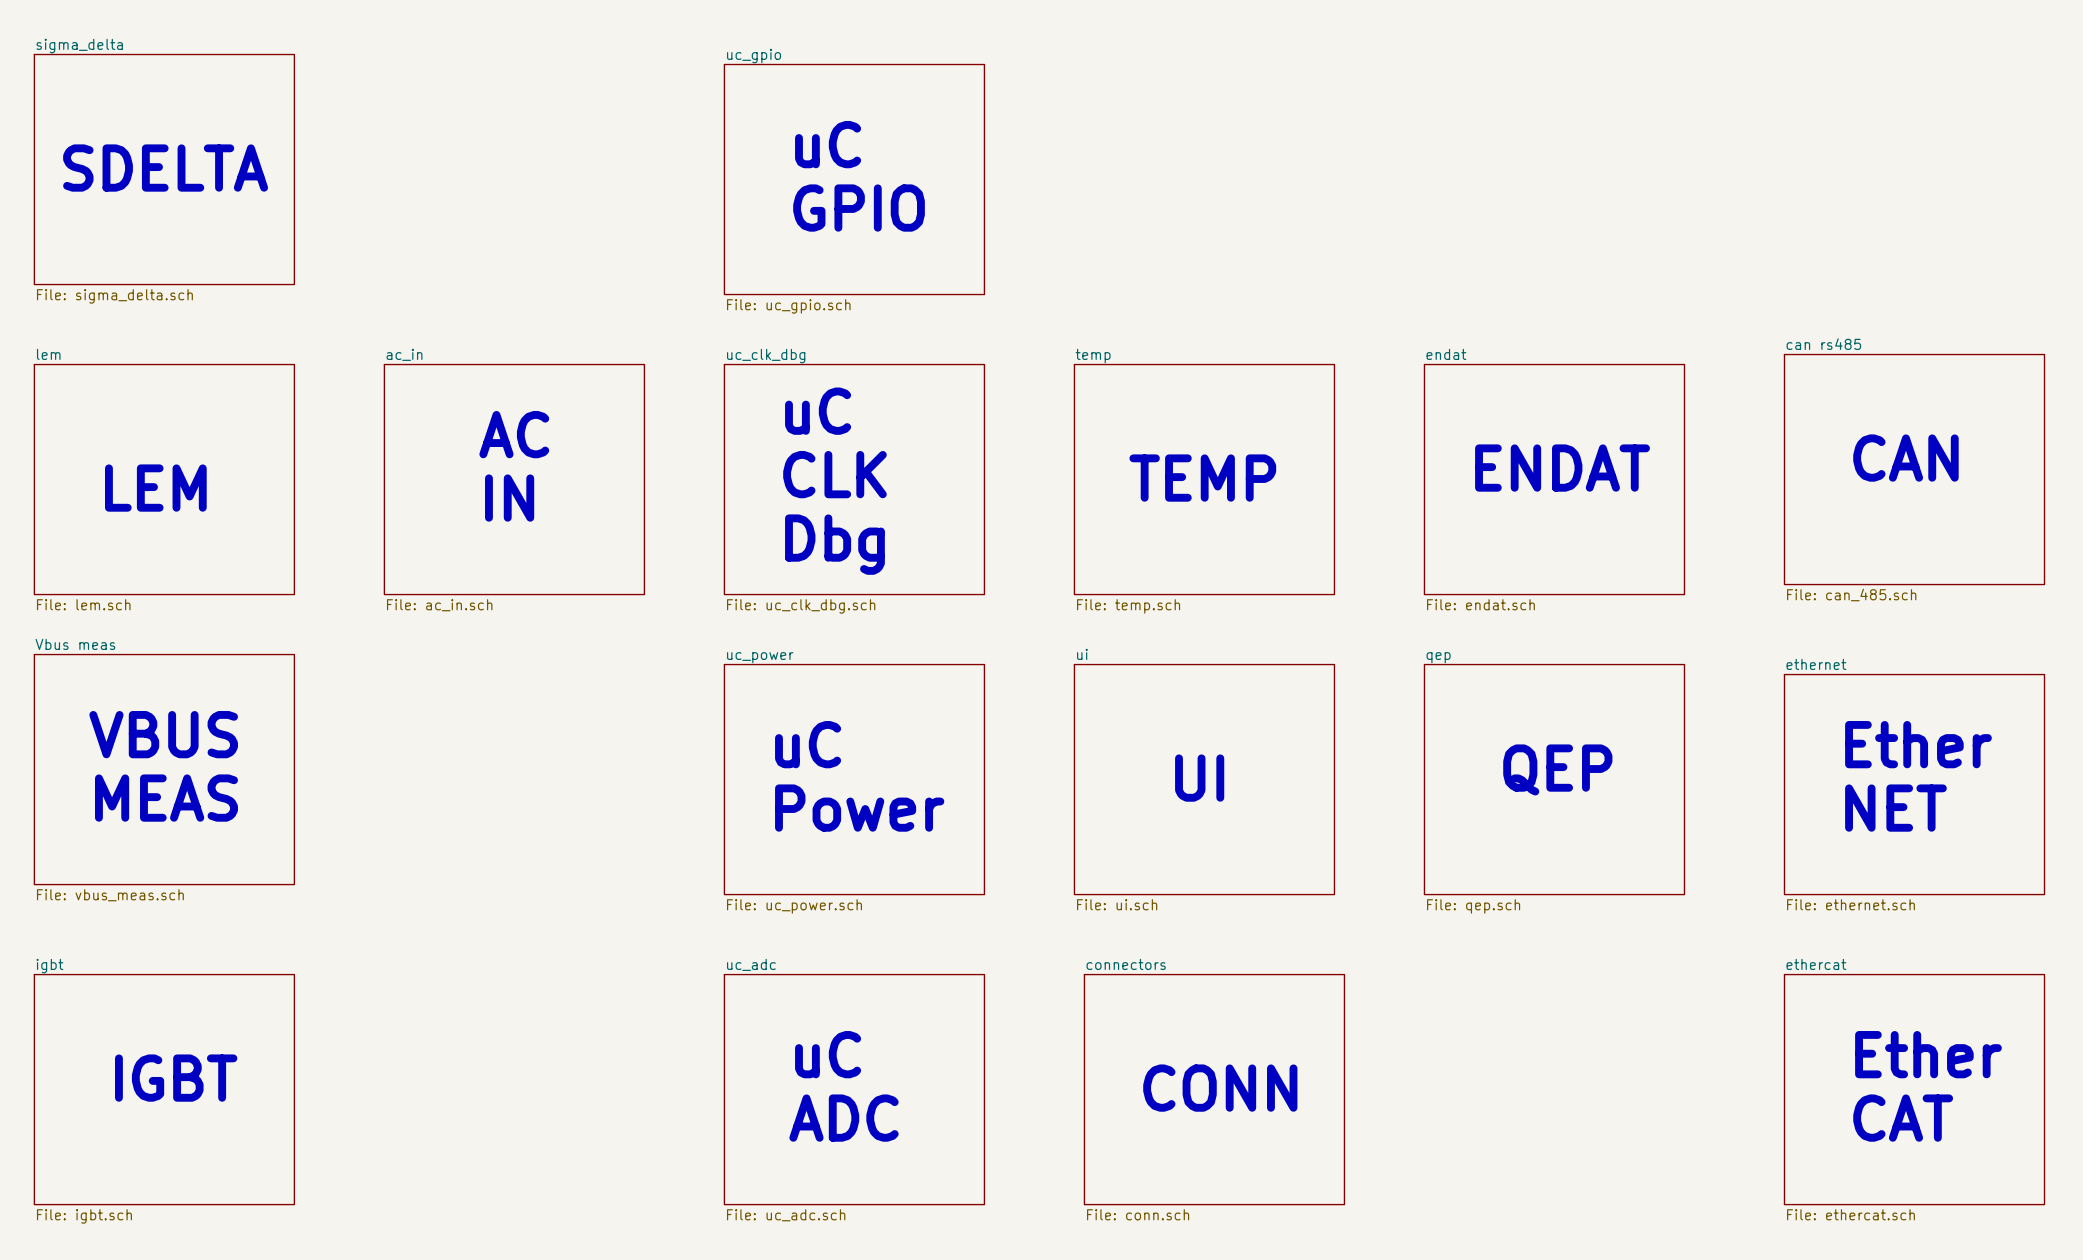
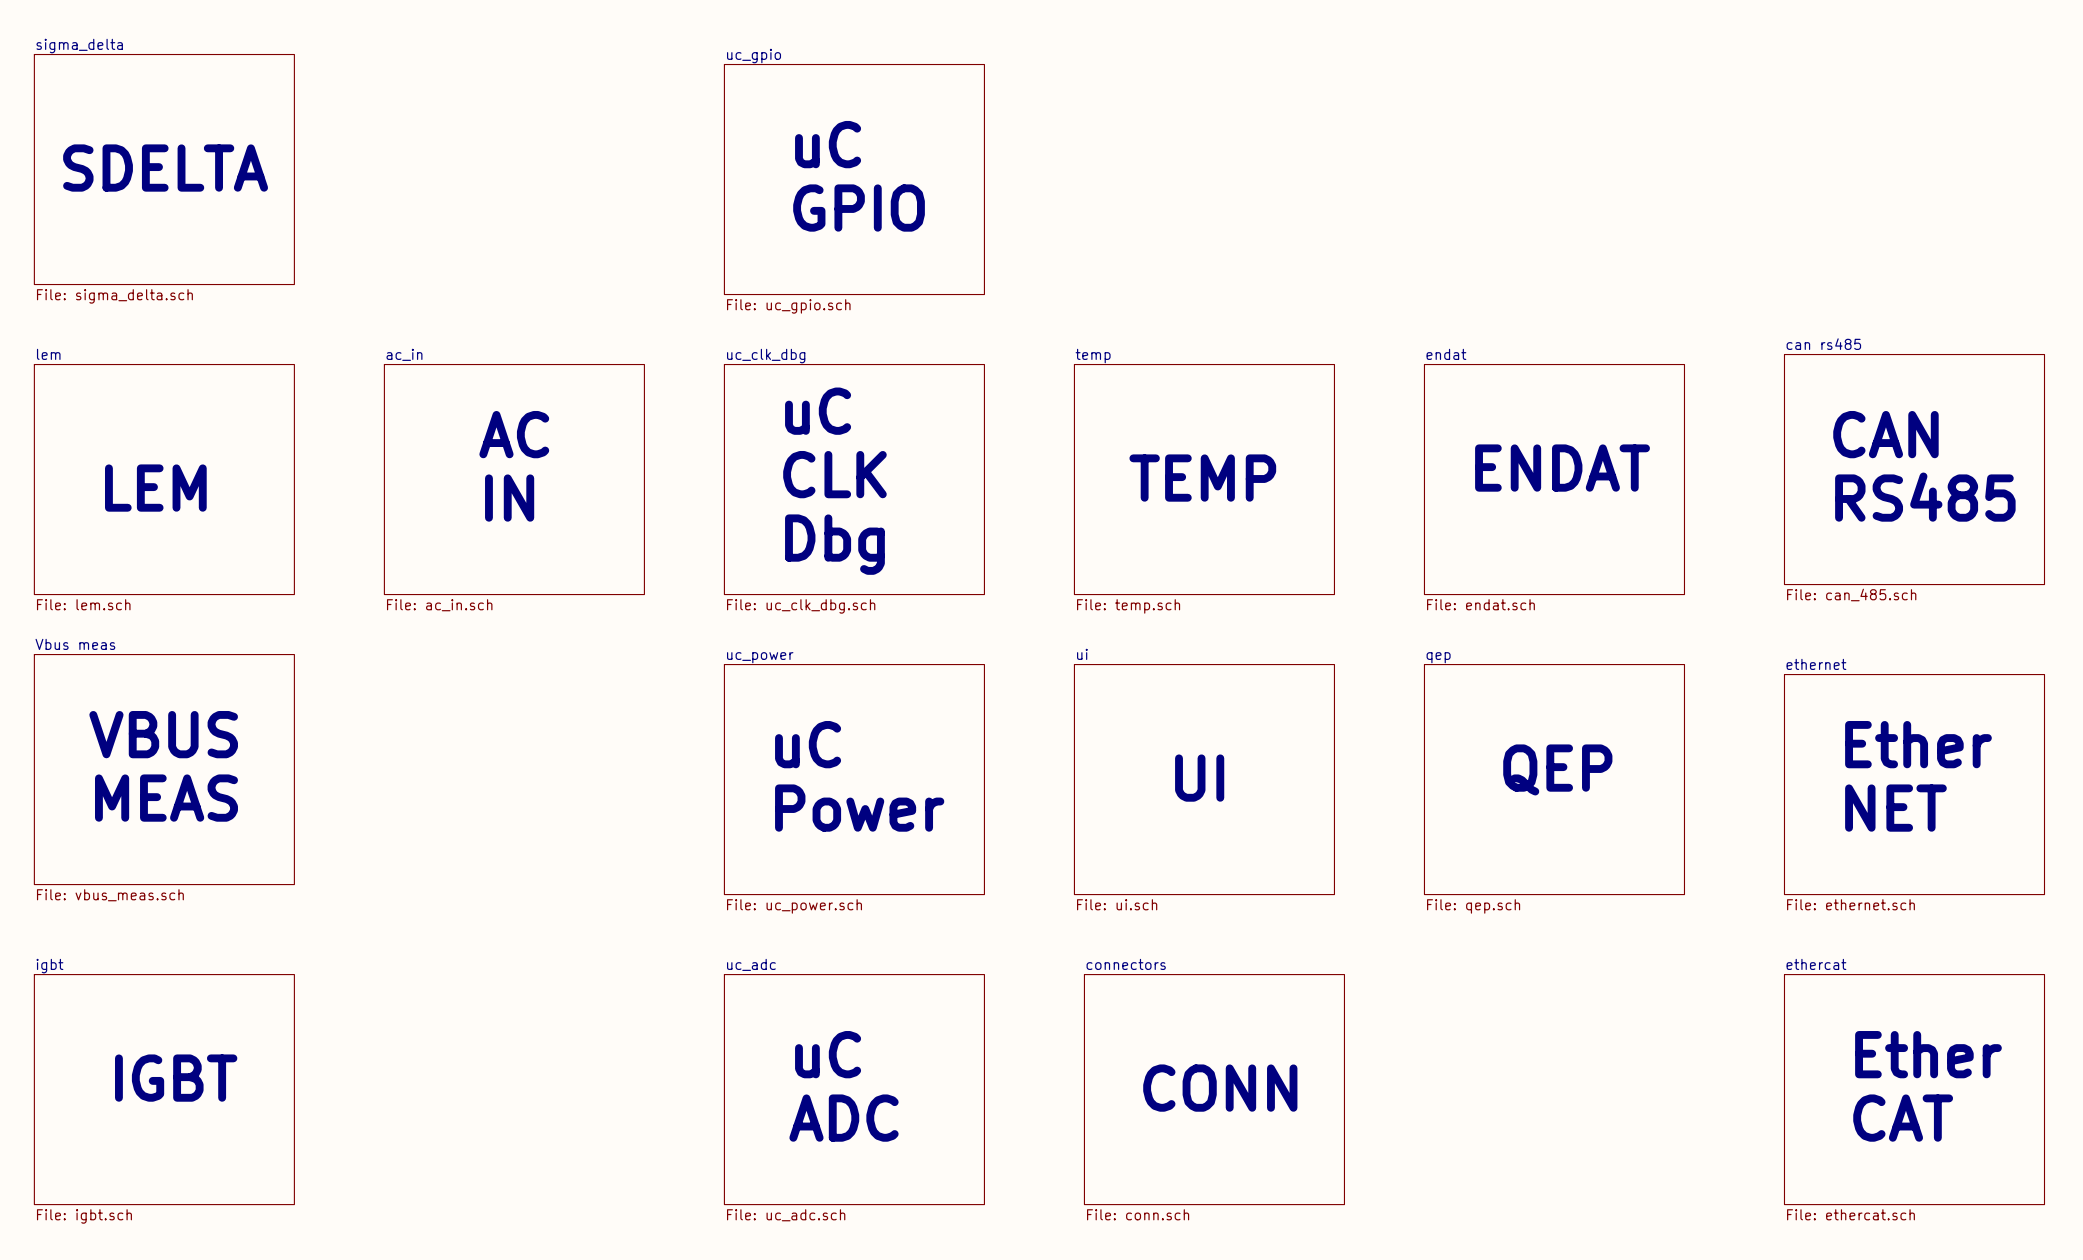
text position: CAN (1905, 458) -> CAN (1885, 434)
text: none -> RS485 (1925, 497)

